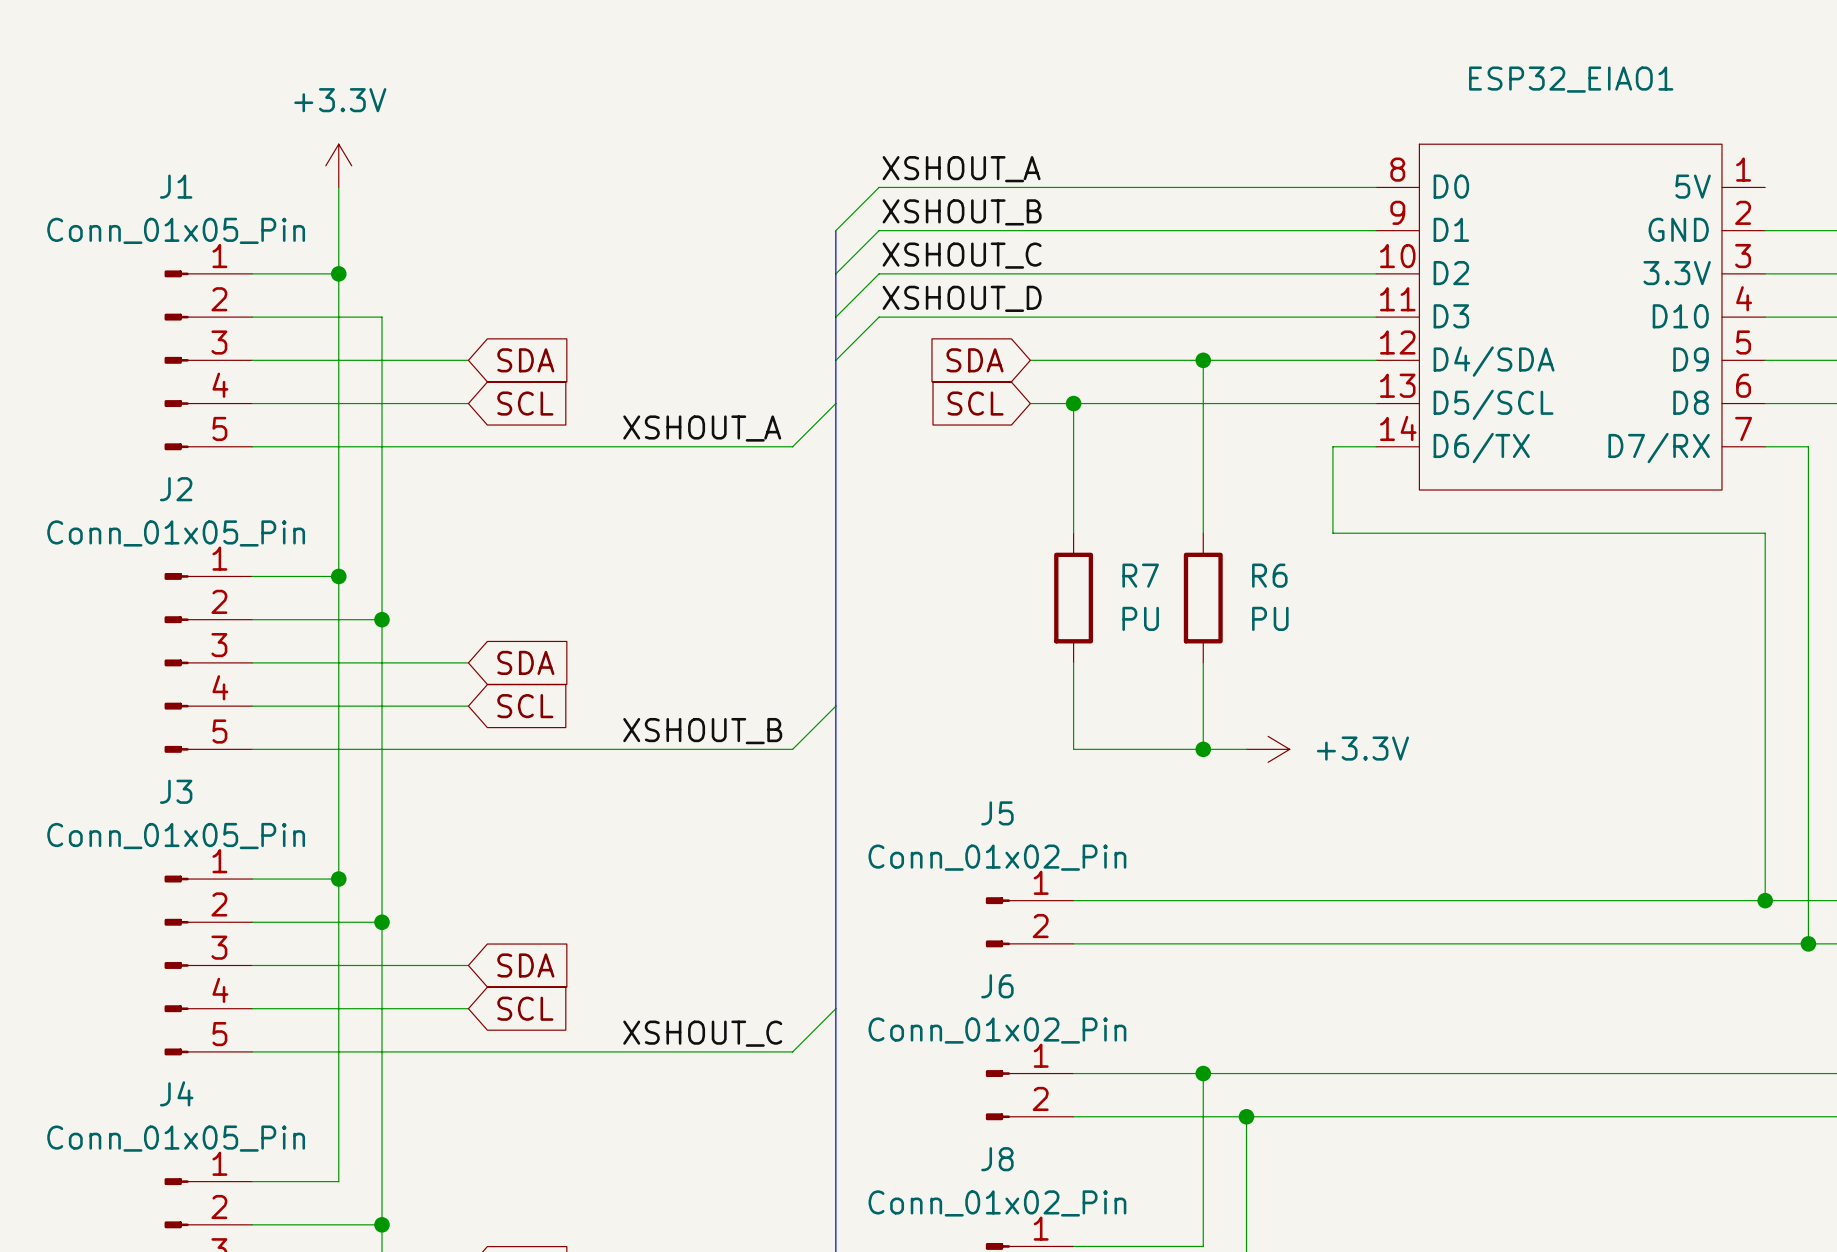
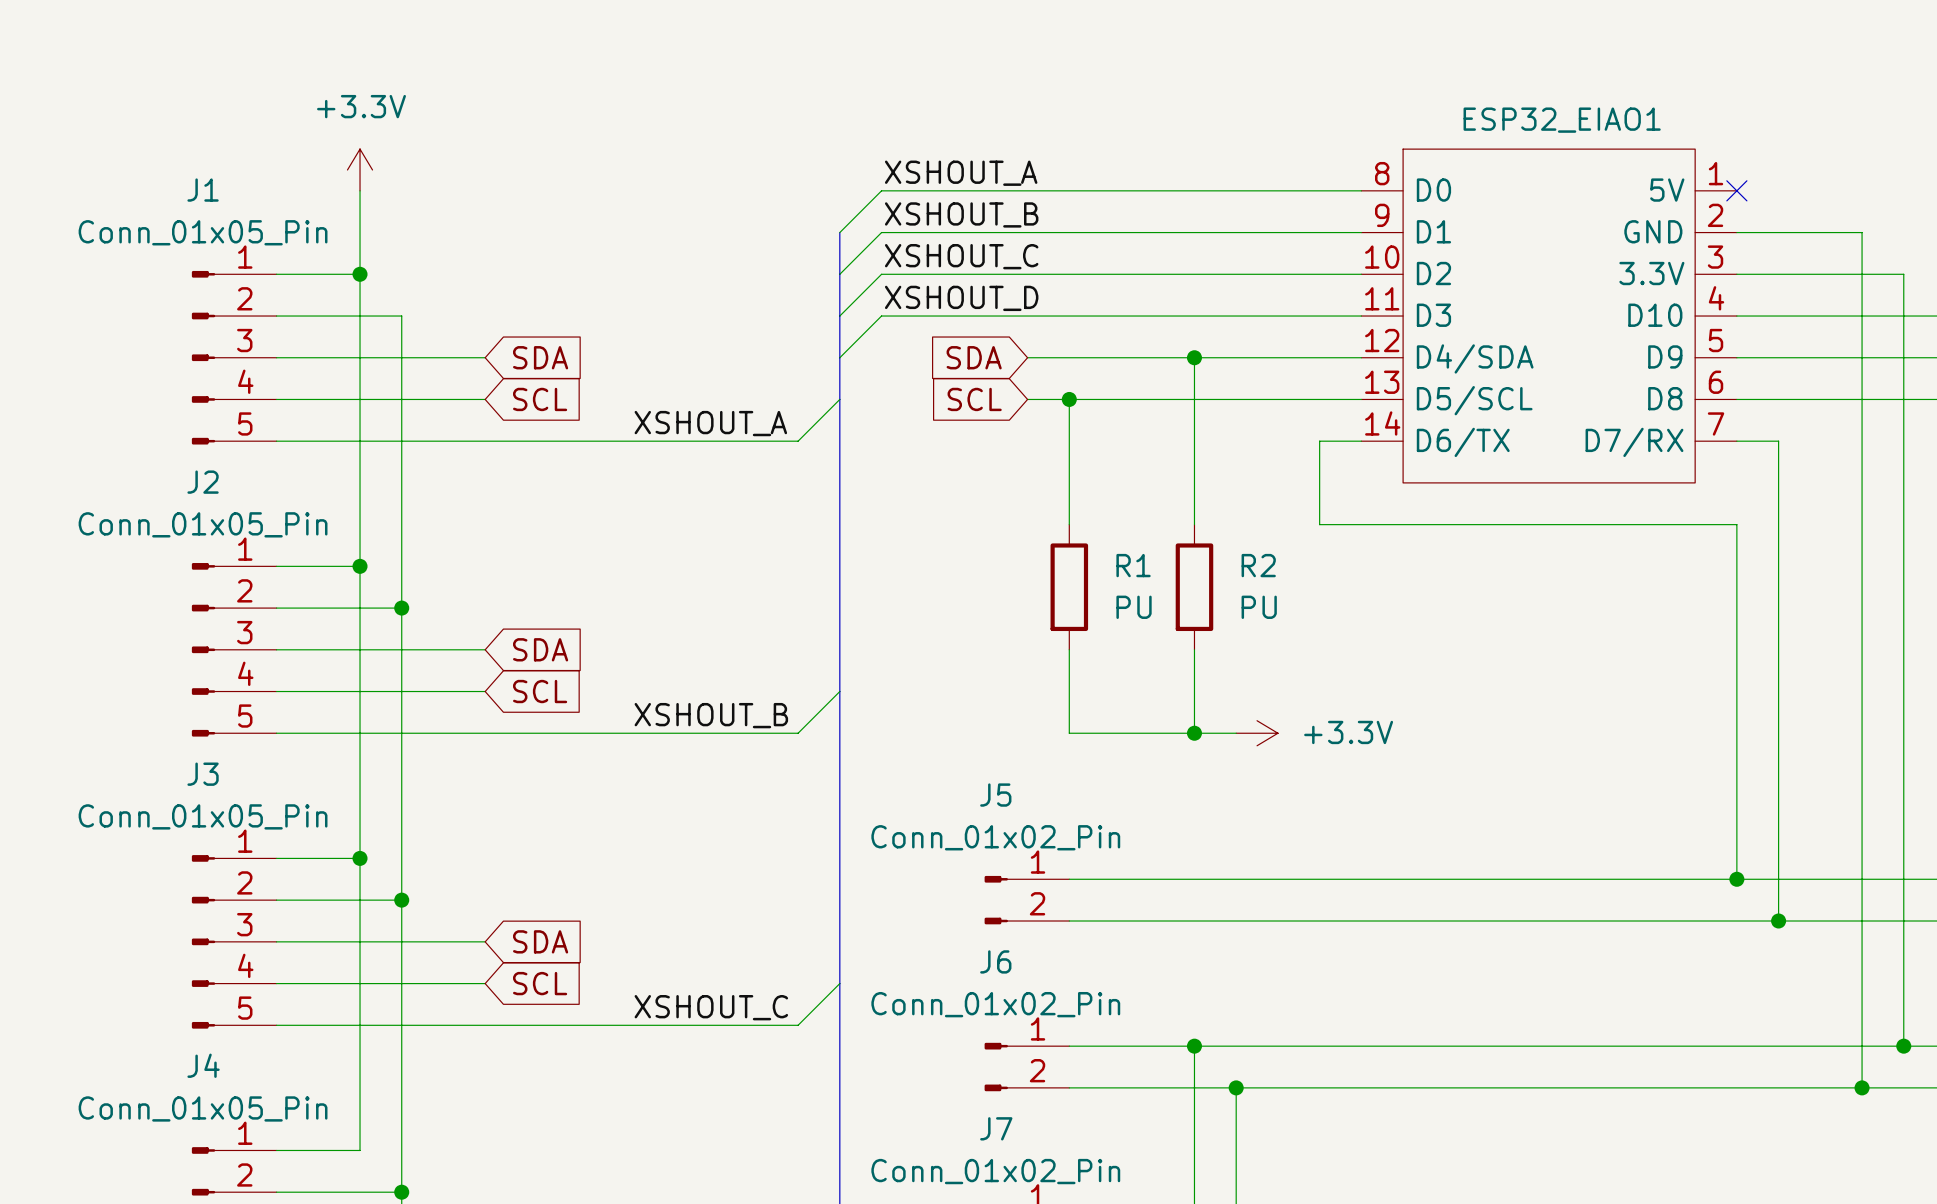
ESP32_EIAO1 name position: ESP32_EIAO1 (1571, 79) -> ESP32_EIAO1 (1562, 120)
no-connect mark: none -> (1736, 190)
R7 name: R7 (1140, 575) -> R1 (1133, 565)
R6 name: R6 (1269, 575) -> R2 (1258, 565)
J8 name: J8 (997, 1159) -> J7 (996, 1128)

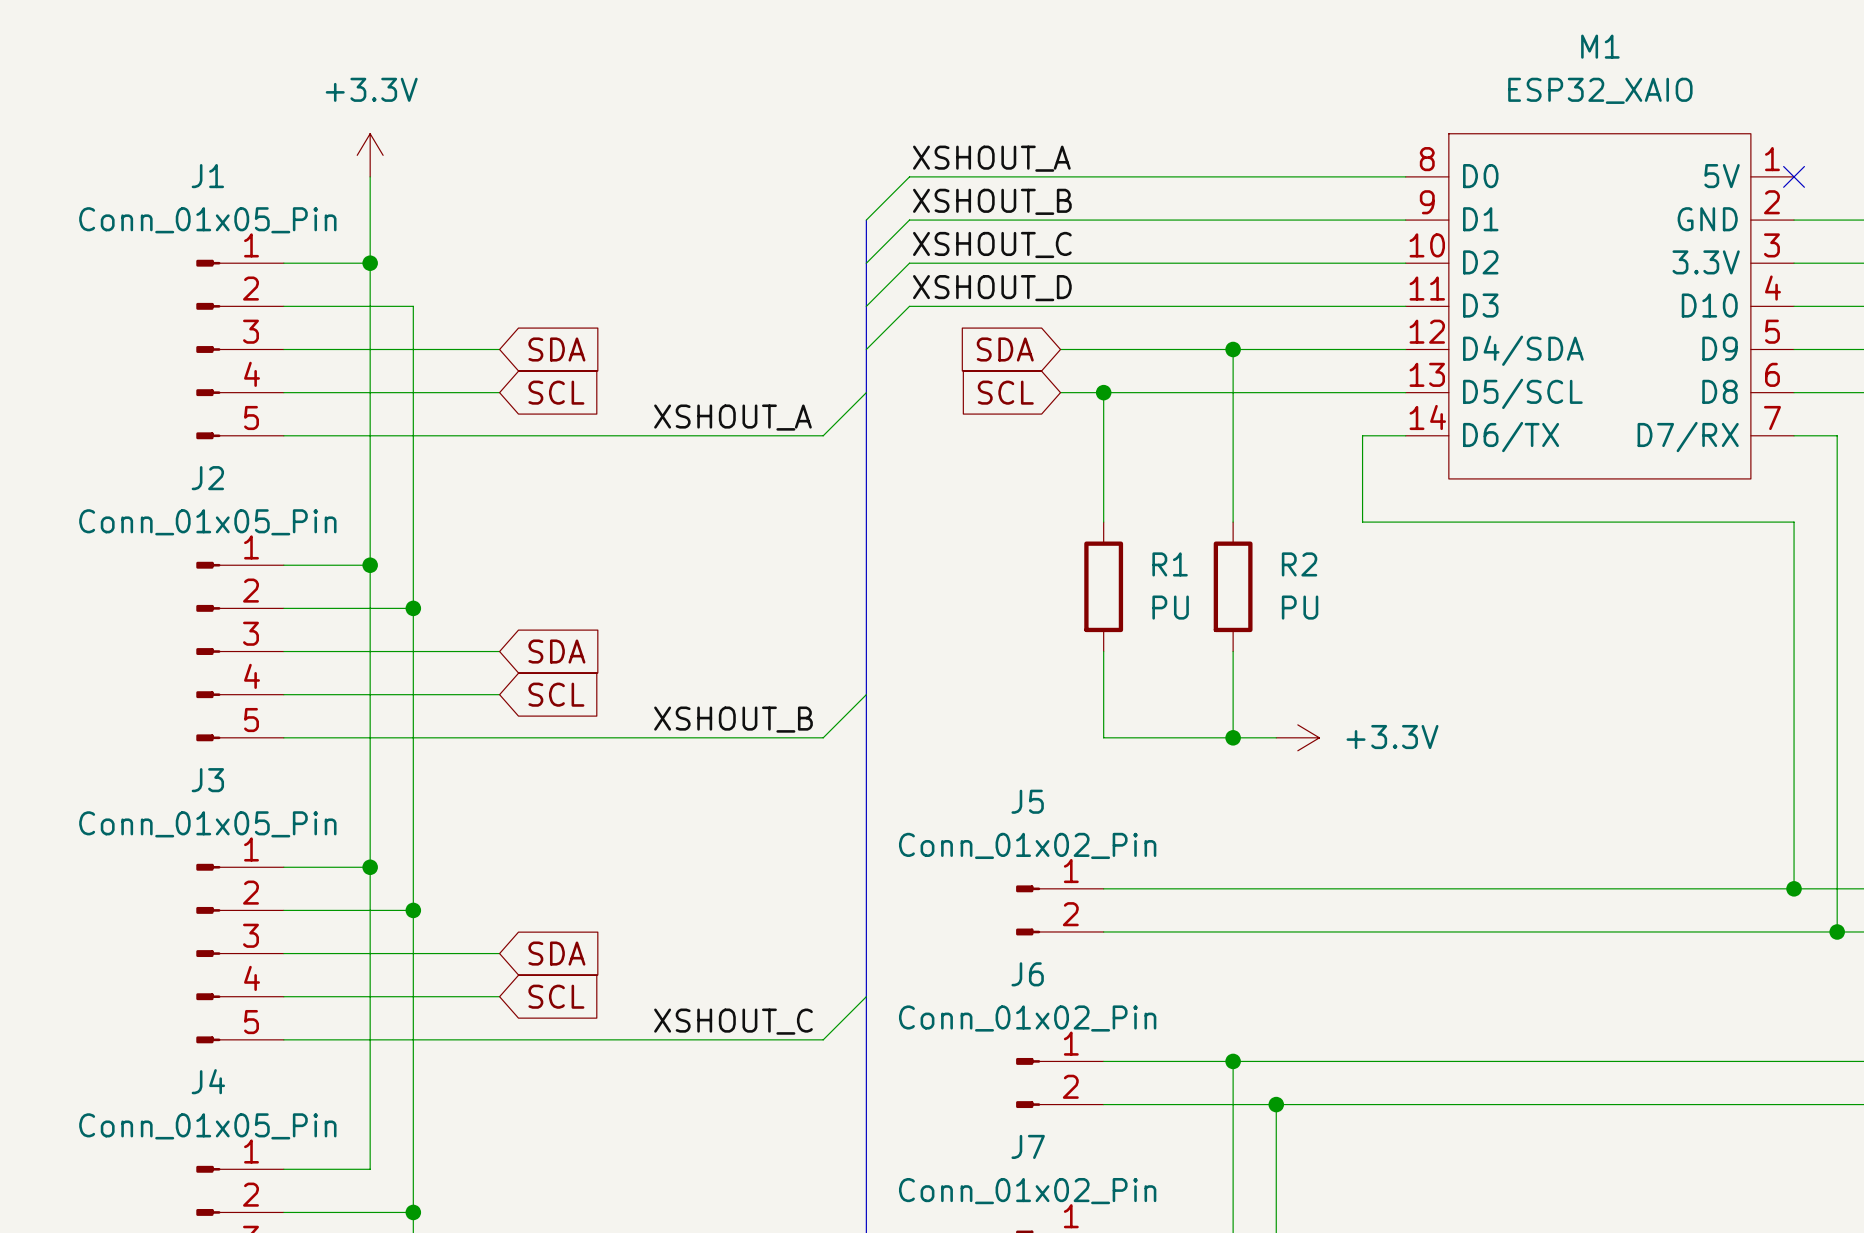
ESP32_EIAO1 value: none -> ESP32_XAIO (1600, 90)
ESP32_EIAO1 name: ESP32_EIAO1 (1562, 120) -> M1 (1600, 46)

